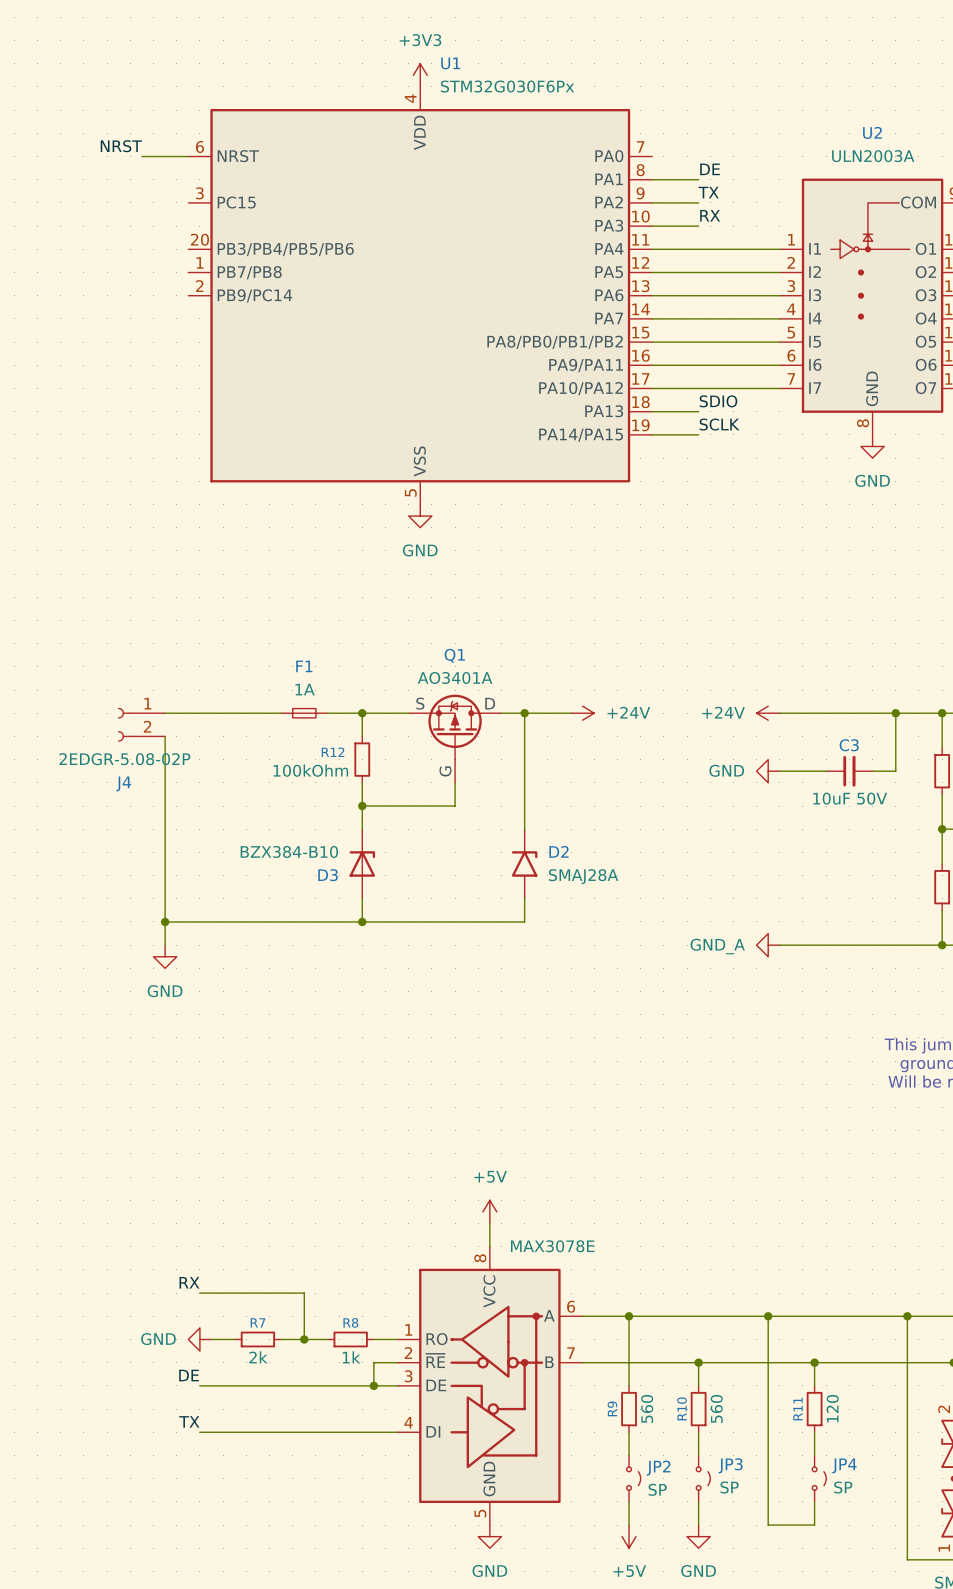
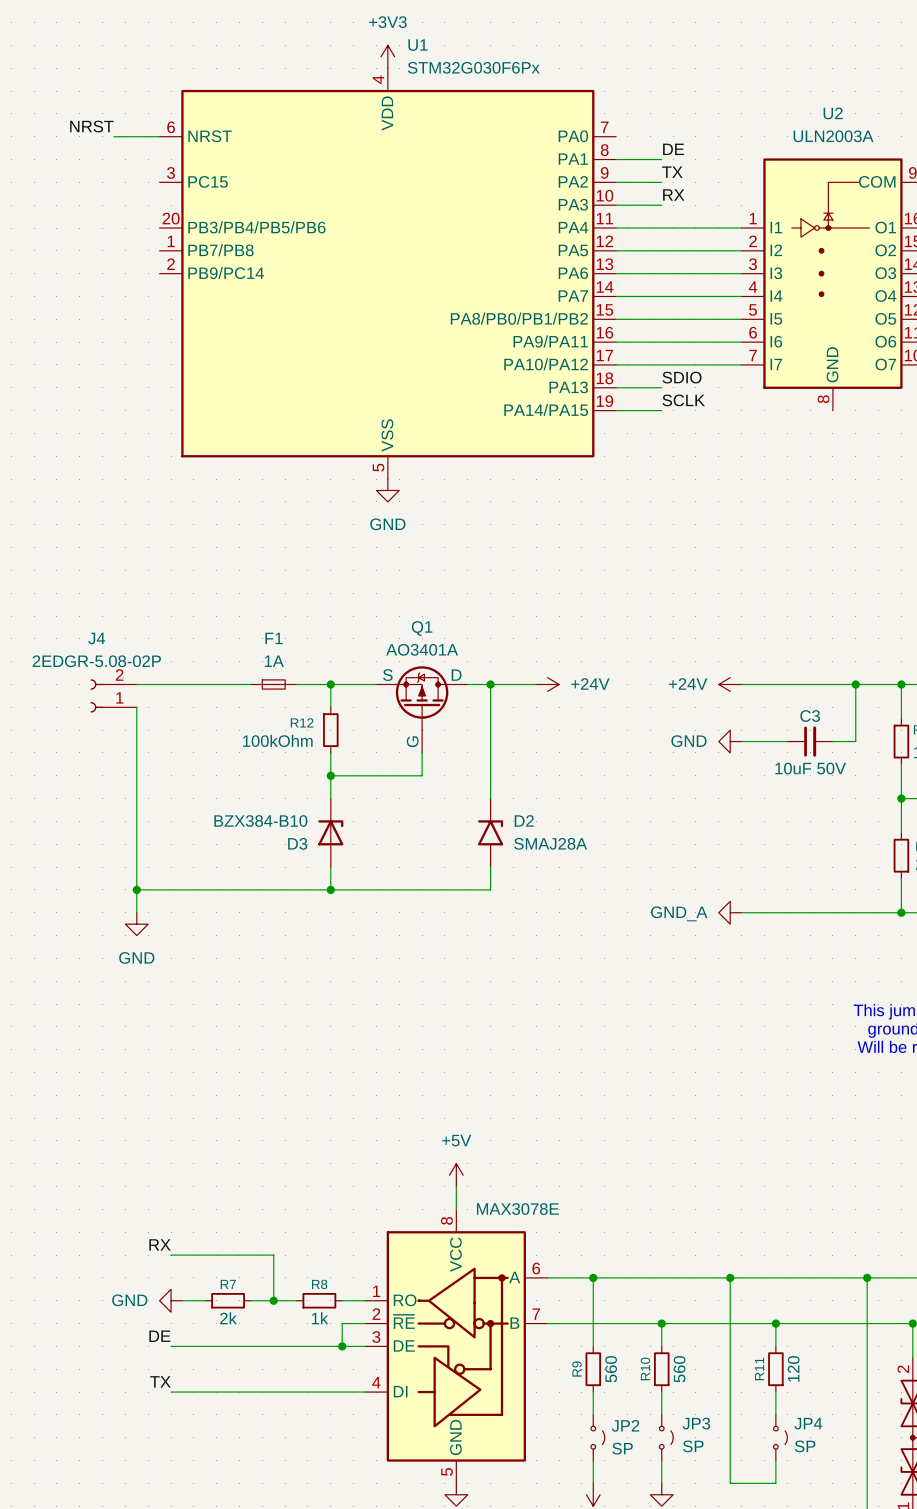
power symbol: GND (872, 446) -> none
J4 flip: as is (124, 724) -> up-down (96, 695)

